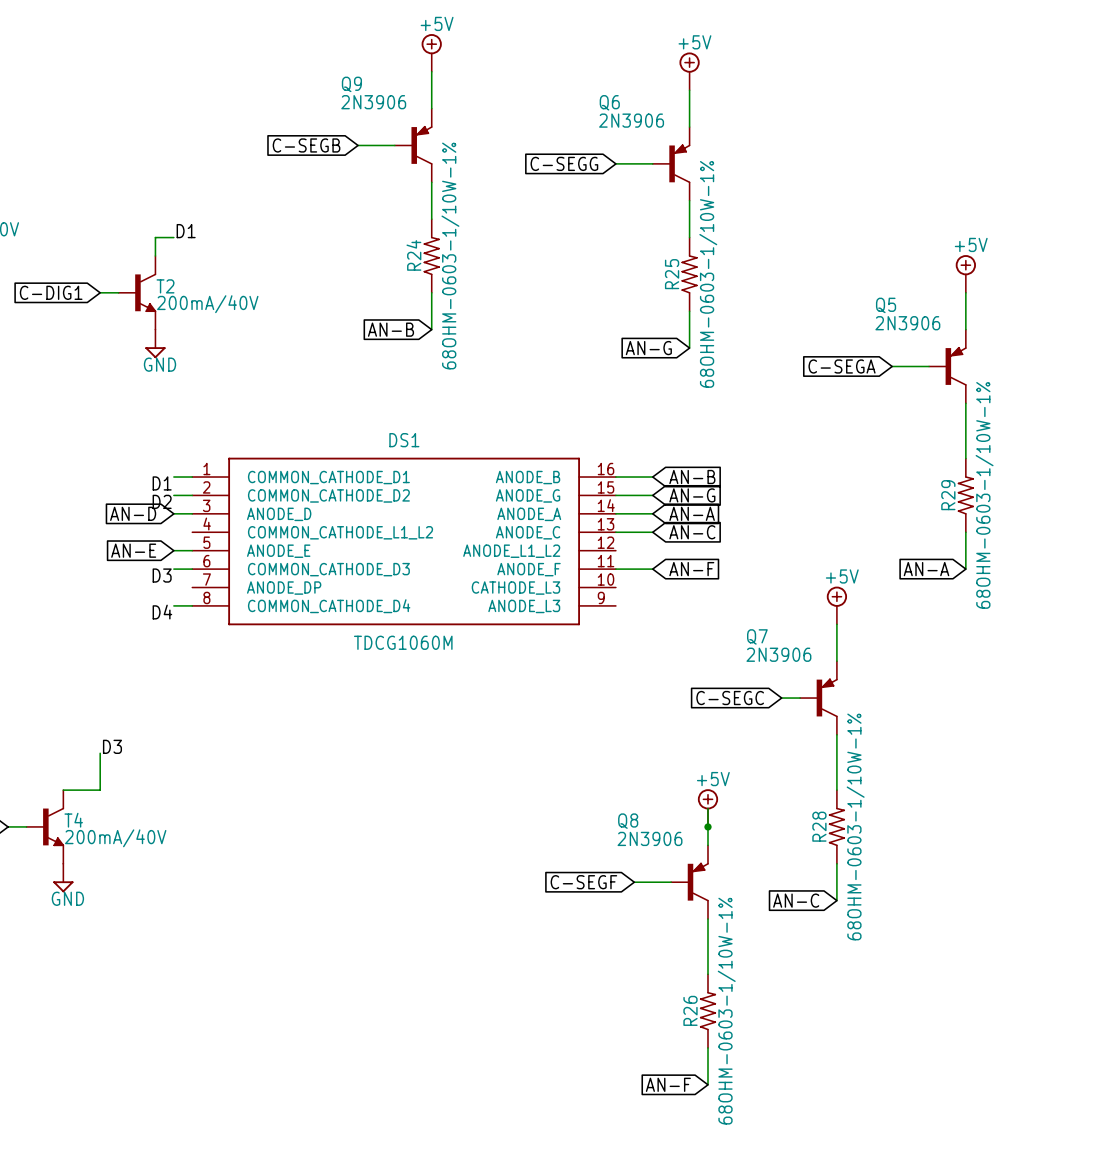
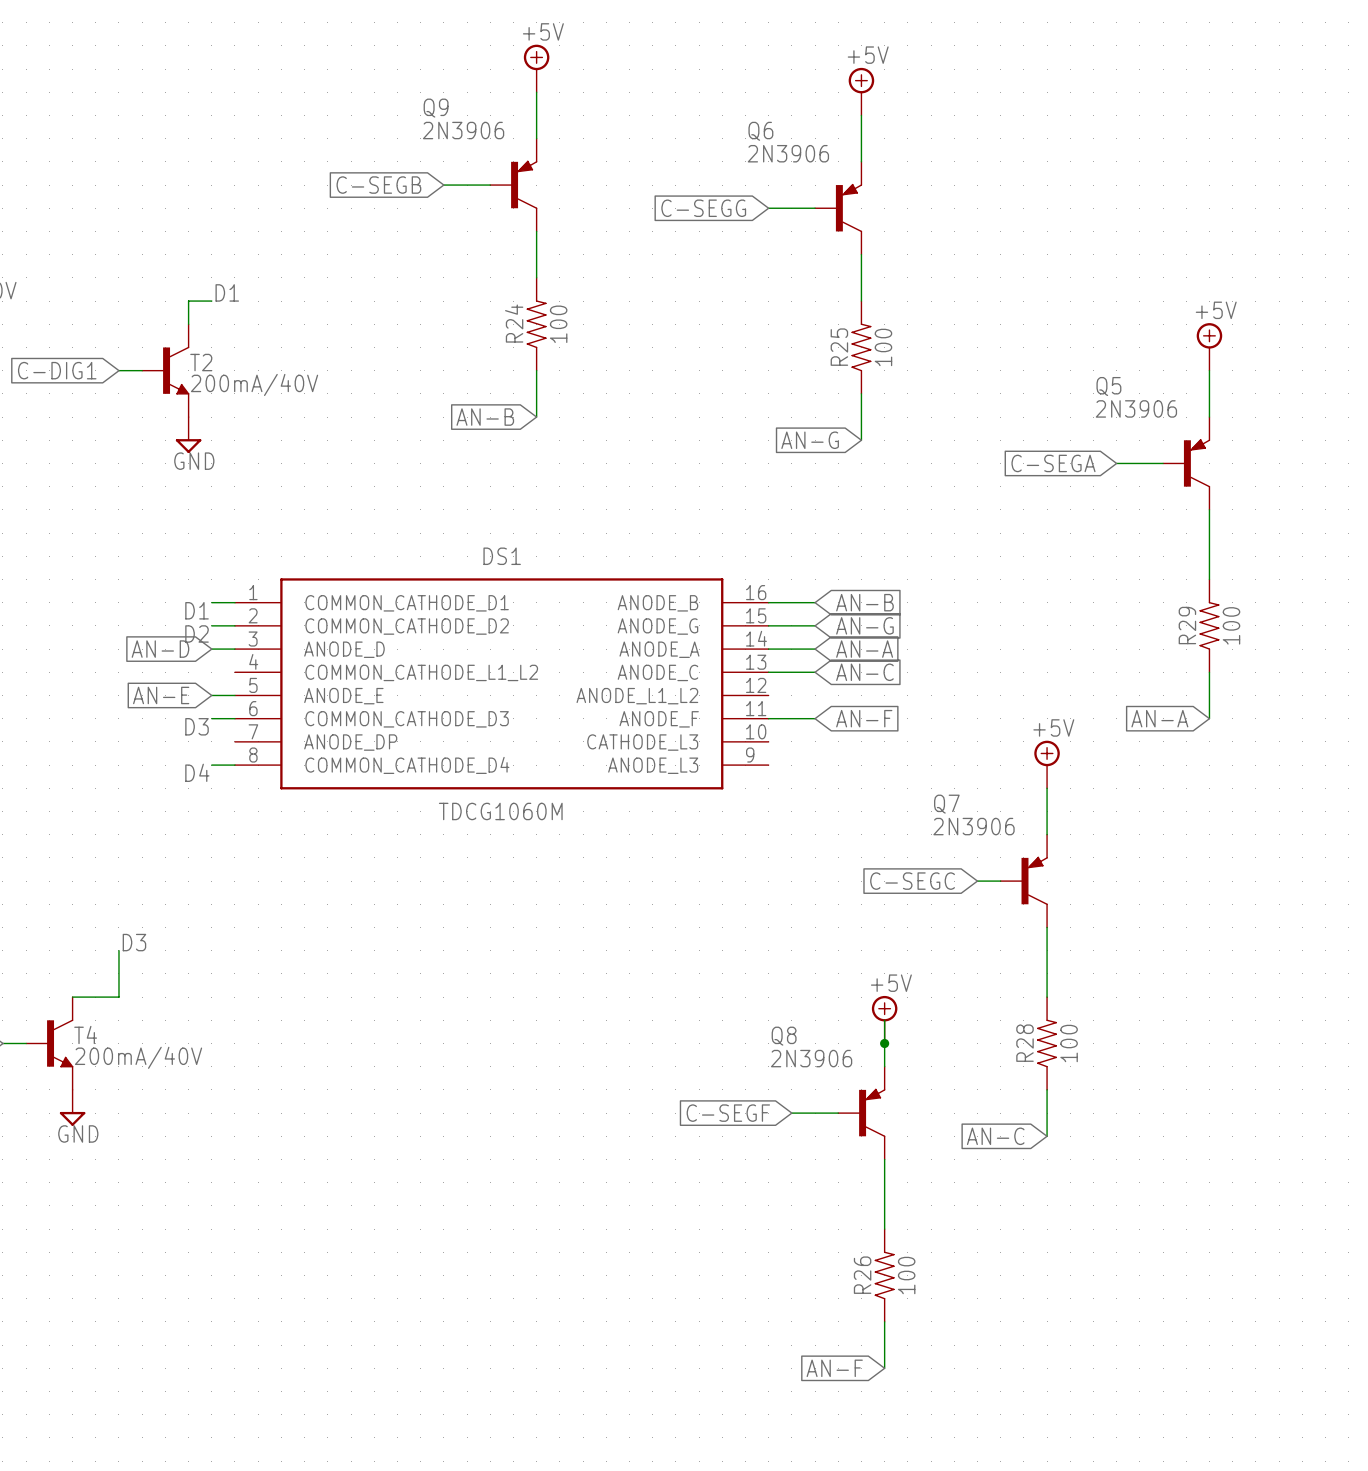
R24 value: 68OHM-0603-1/10W-1% (450, 255) -> 100 (558, 324)
R25 value: 68OHM-0603-1/10W-1% (708, 274) -> 100 (883, 347)
R29 value: 68OHM-0603-1/10W-1% (984, 495) -> 100 (1231, 625)
R28 value: 68OHM-0603-1/10W-1% (855, 826) -> 100 (1069, 1043)
R26 value: 68OHM-0603-1/10W-1% (726, 1011) -> 100 (906, 1275)

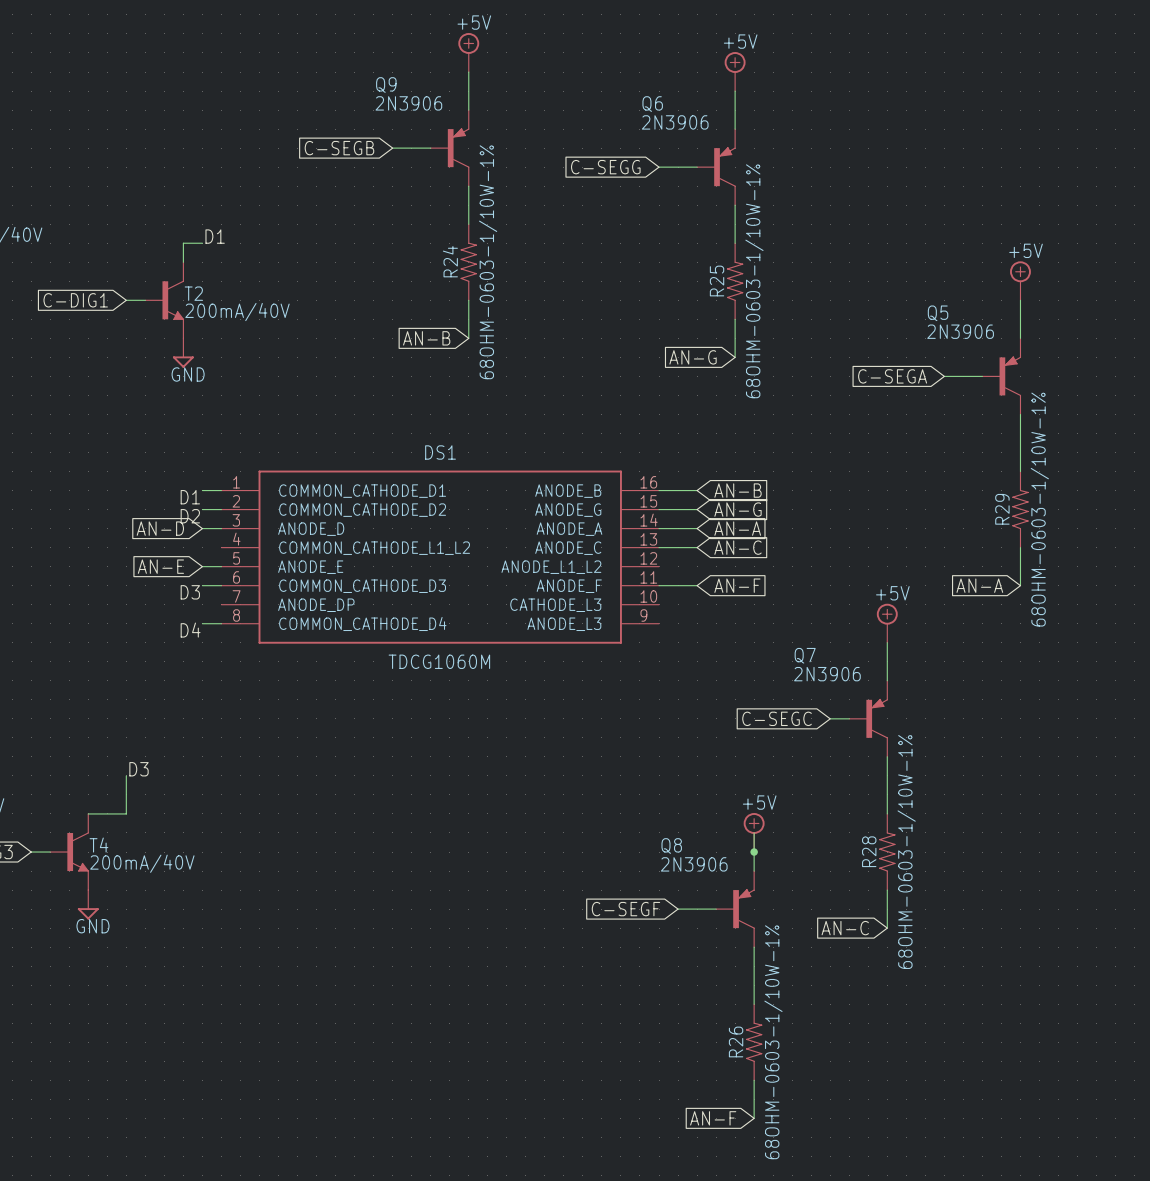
R24 value: 100 (558, 324) -> 68OHM-0603-1/10W-1% (488, 262)
R25 value: 100 (883, 347) -> 68OHM-0603-1/10W-1% (754, 281)
R29 value: 100 (1231, 625) -> 68OHM-0603-1/10W-1% (1039, 509)
R28 value: 100 (1069, 1043) -> 68OHM-0603-1/10W-1% (906, 852)
R26 value: 100 (906, 1275) -> 68OHM-0603-1/10W-1% (773, 1042)

